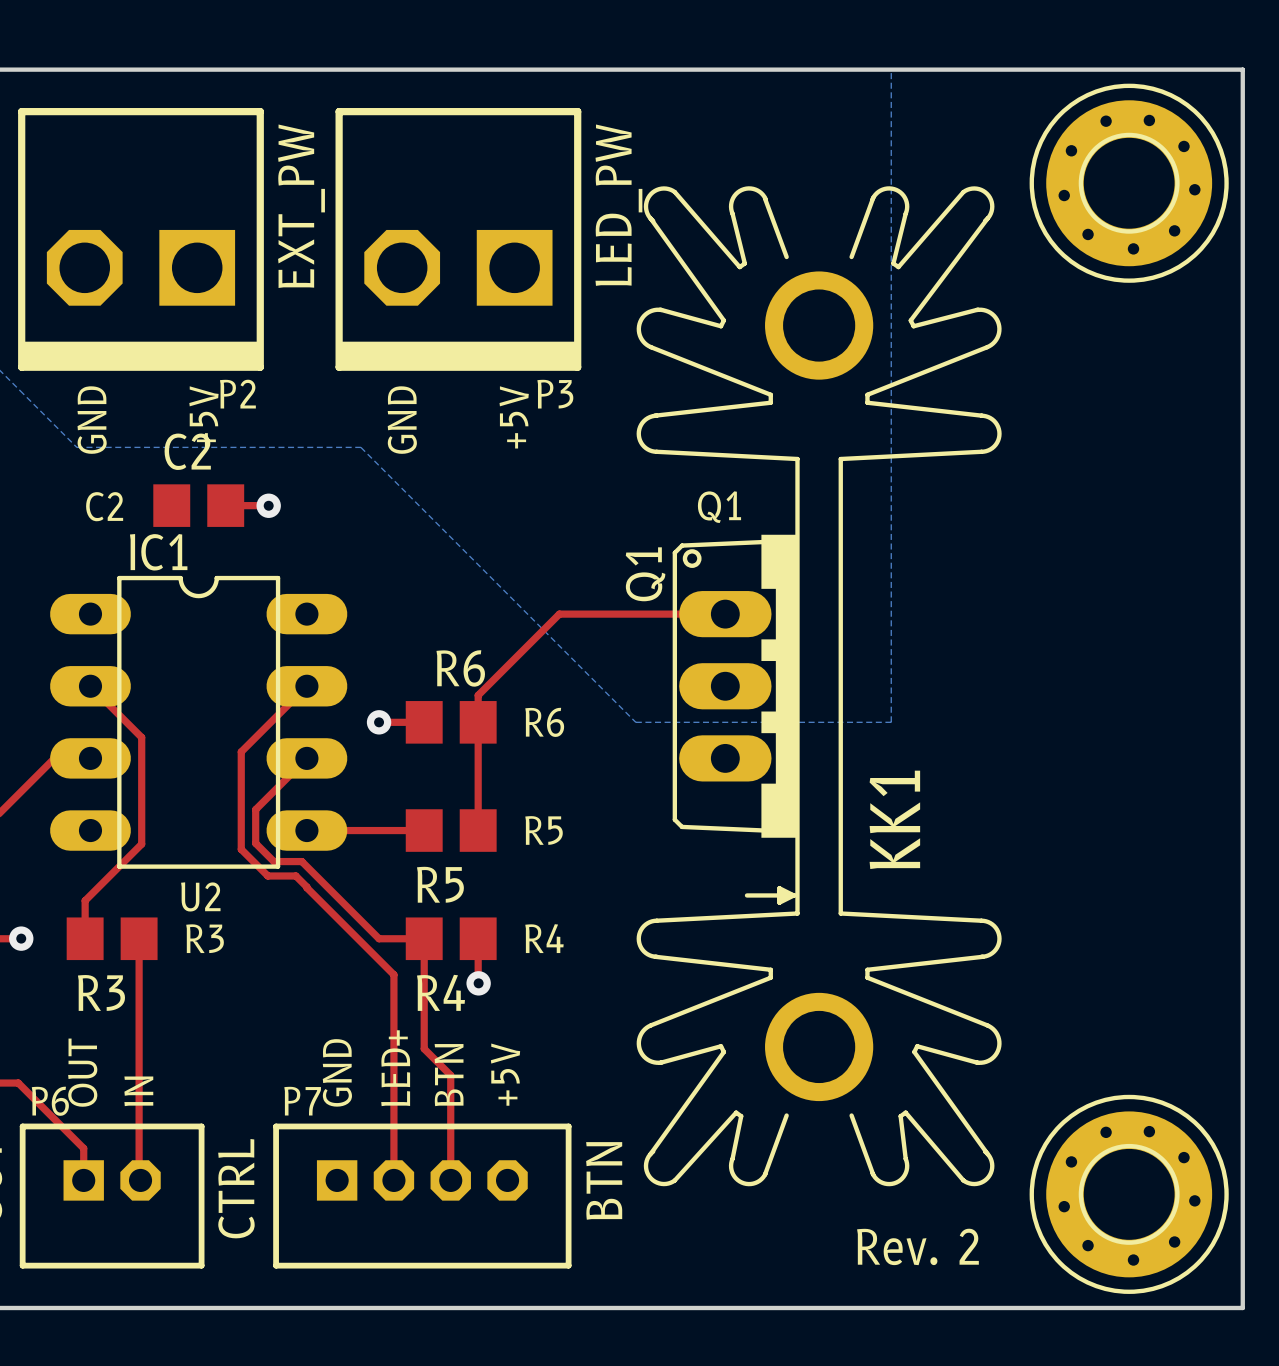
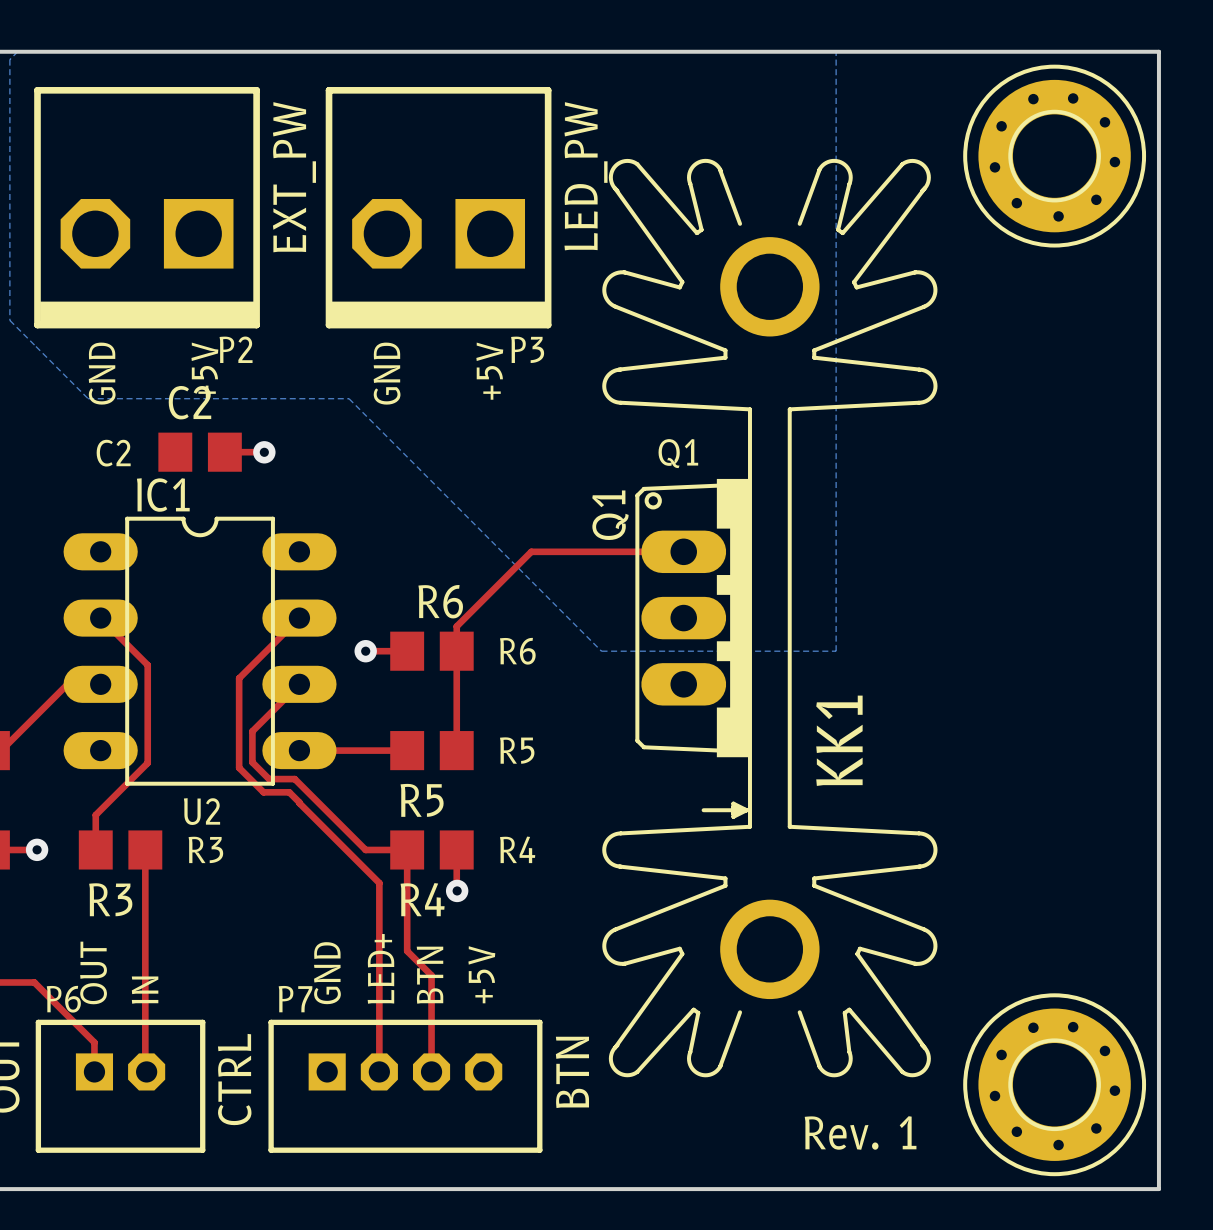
text: Rev. 2 (917, 1246) -> Rev. 1 (860, 1132)

